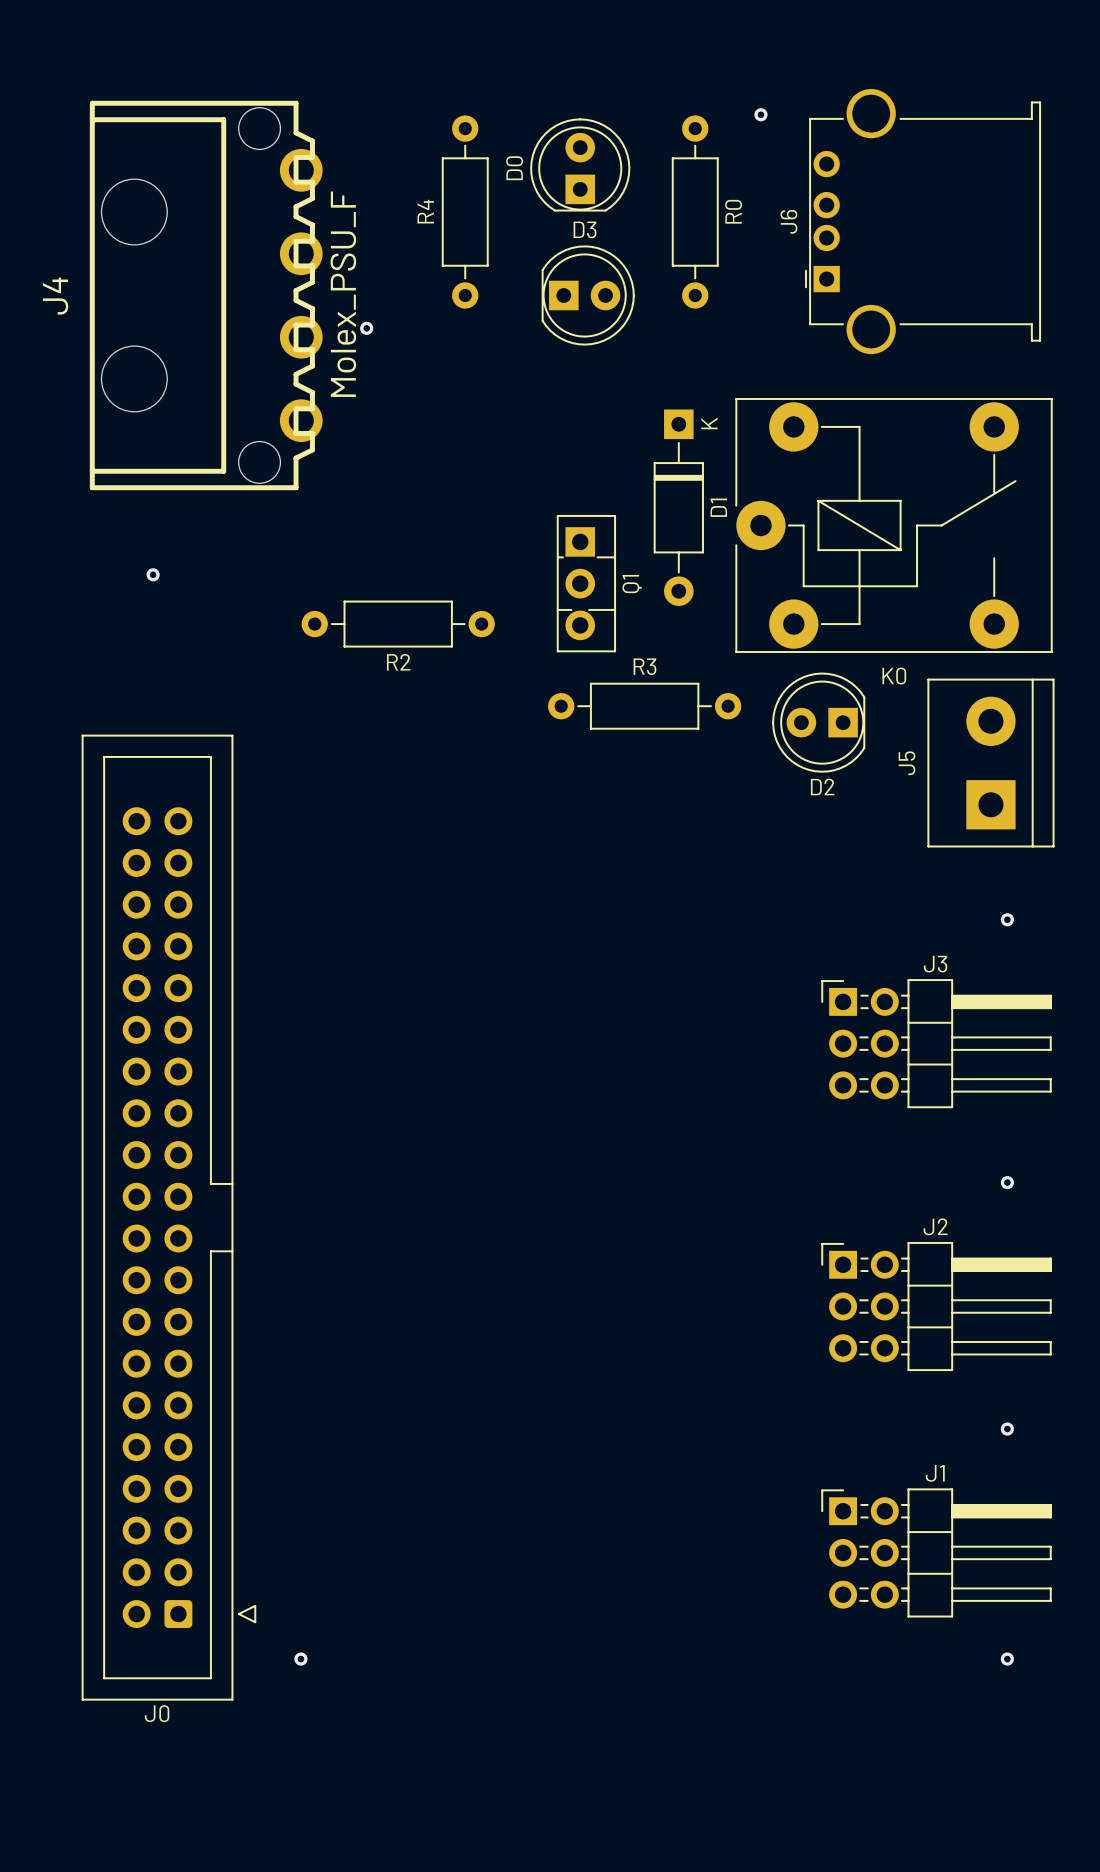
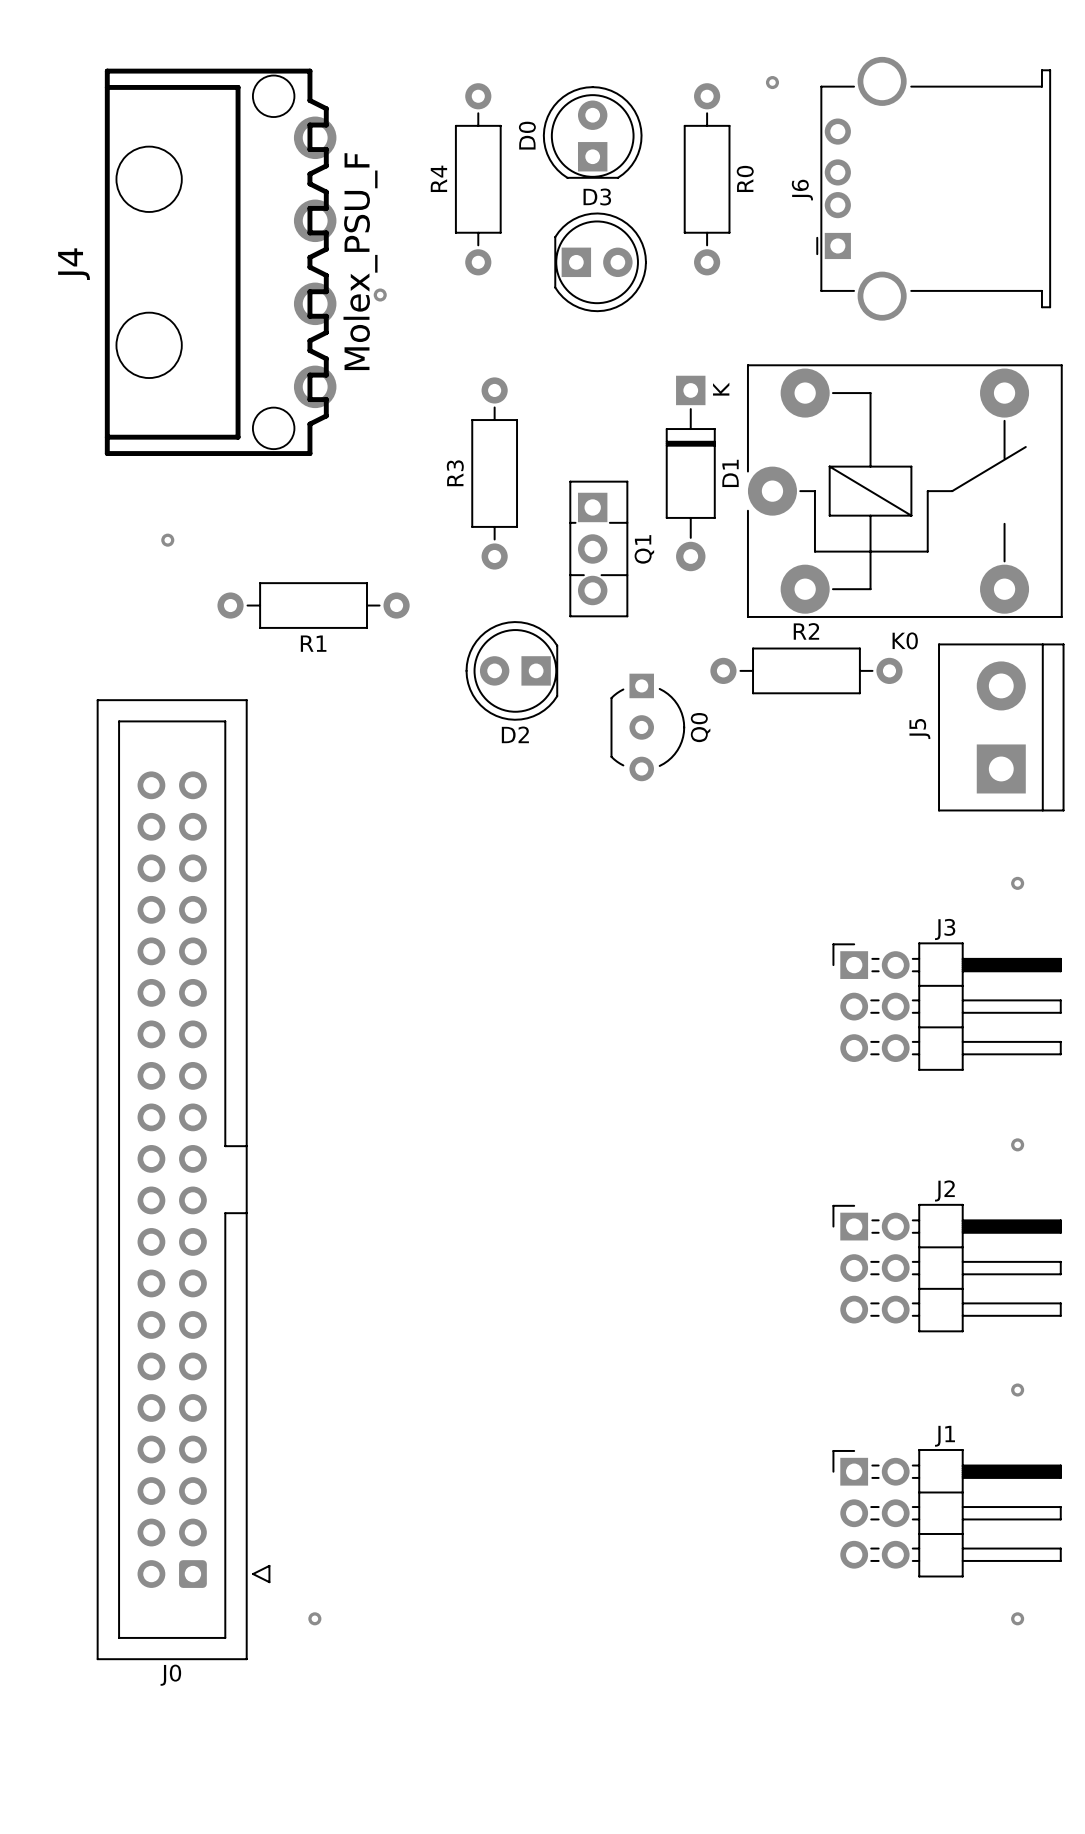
R2 position: (398, 624) -> (806, 670)
R1: none -> (313, 605)
R2 name position: R2 (398, 662) -> R2 (806, 631)
R3 name position: R3 (644, 666) -> R3 (455, 473)
R3 rotation: 0° (644, 706) -> 90° clockwise (494, 473)
R3 position: (644, 706) -> (494, 473)
D2 position: (818, 722) -> (511, 670)
Q0: none -> (647, 727)

